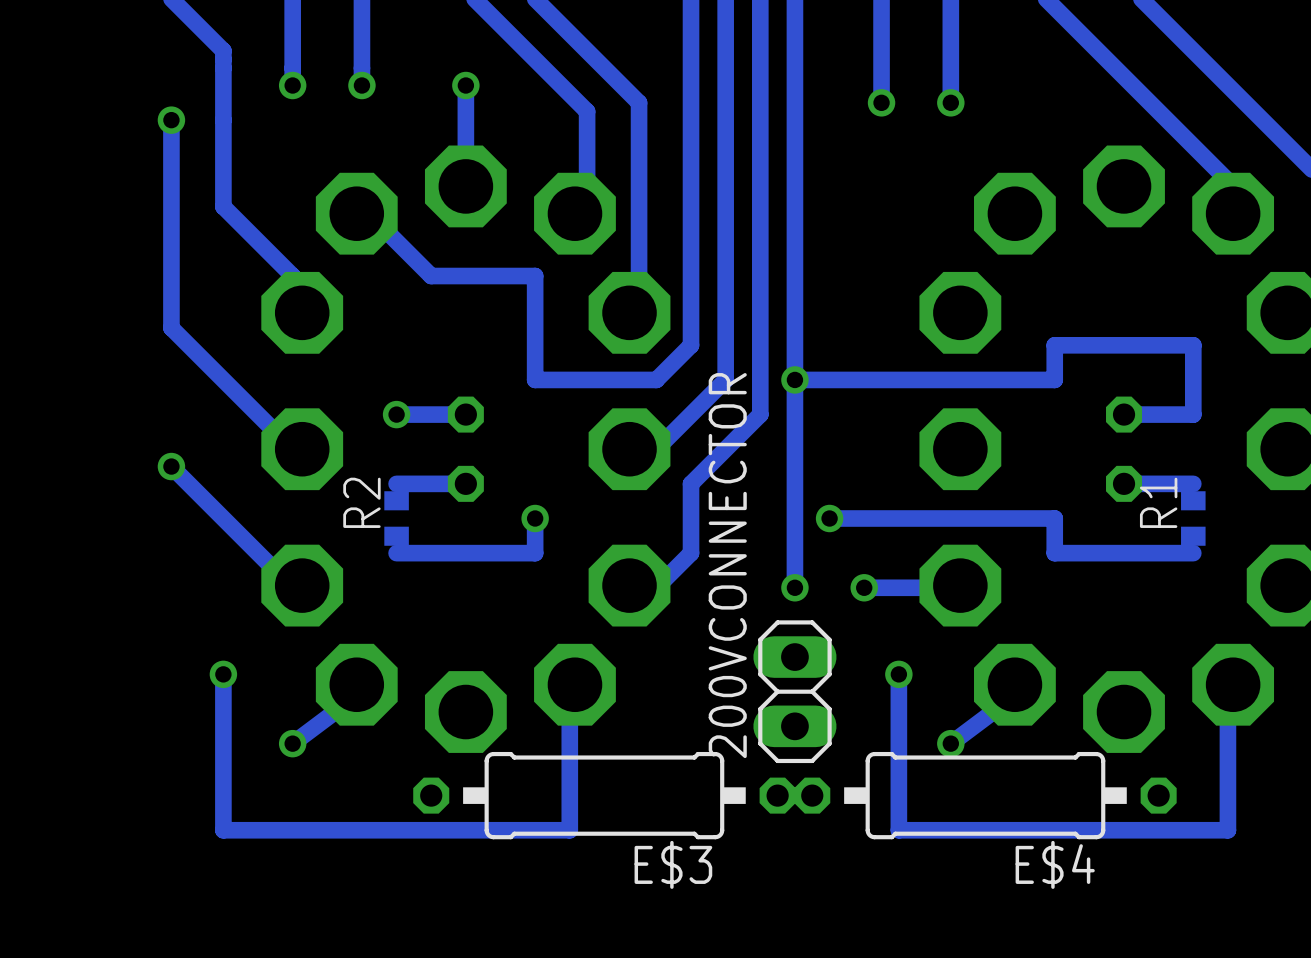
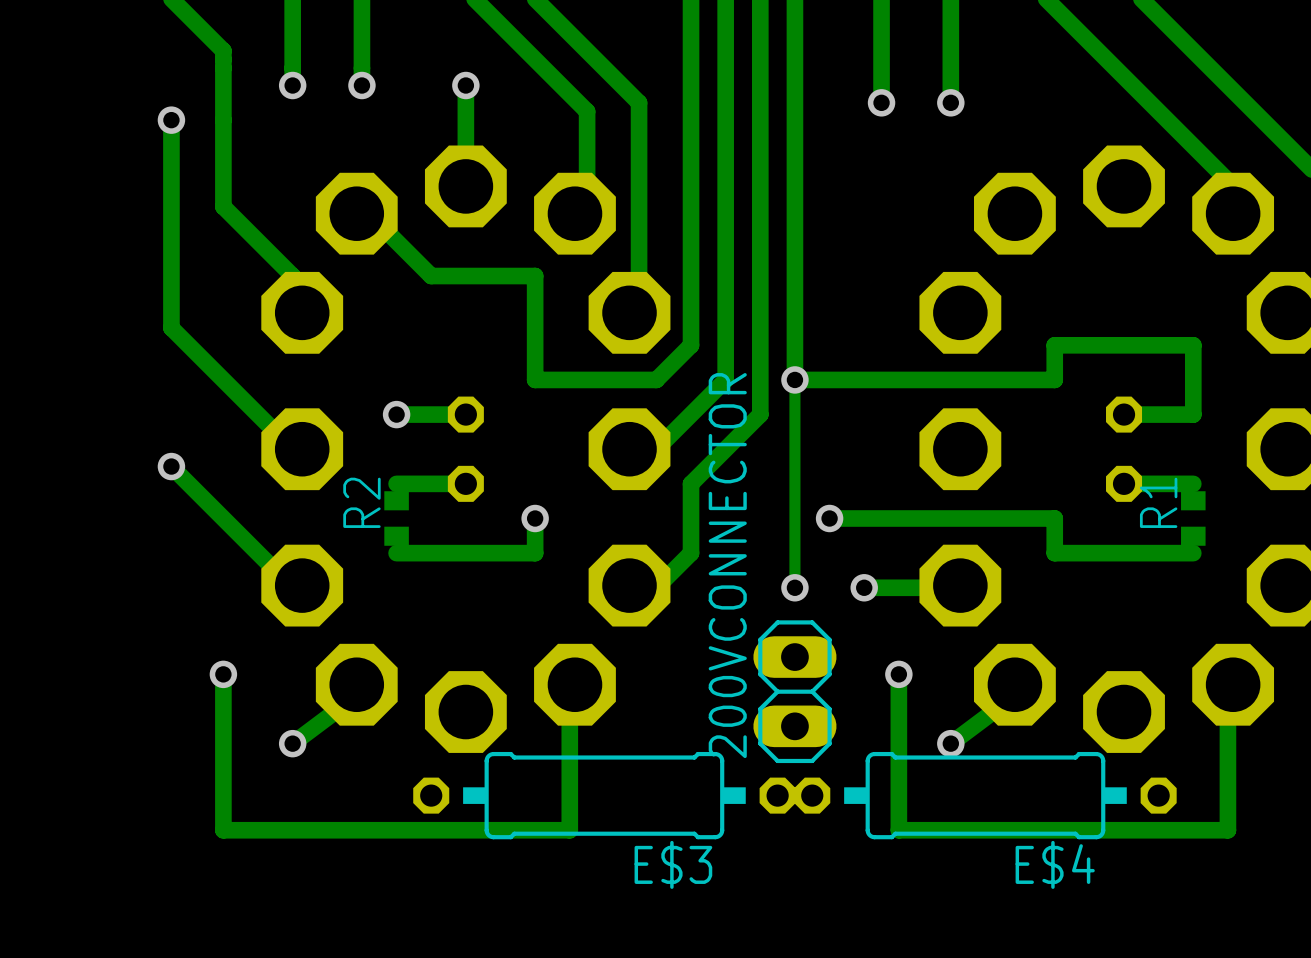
track width: thick (794, 379) (794, 587) -> thin (794, 379) (794, 587)

